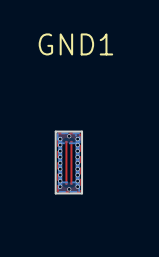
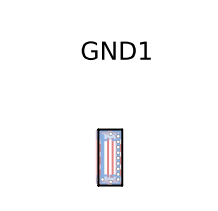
via: (60, 139) -> none
via: (60, 145) -> none
via: (60, 151) -> none
via: (60, 157) -> none
via: (60, 163) -> none
via: (60, 169) -> none
via: (60, 175) -> none
via: (60, 181) -> none

